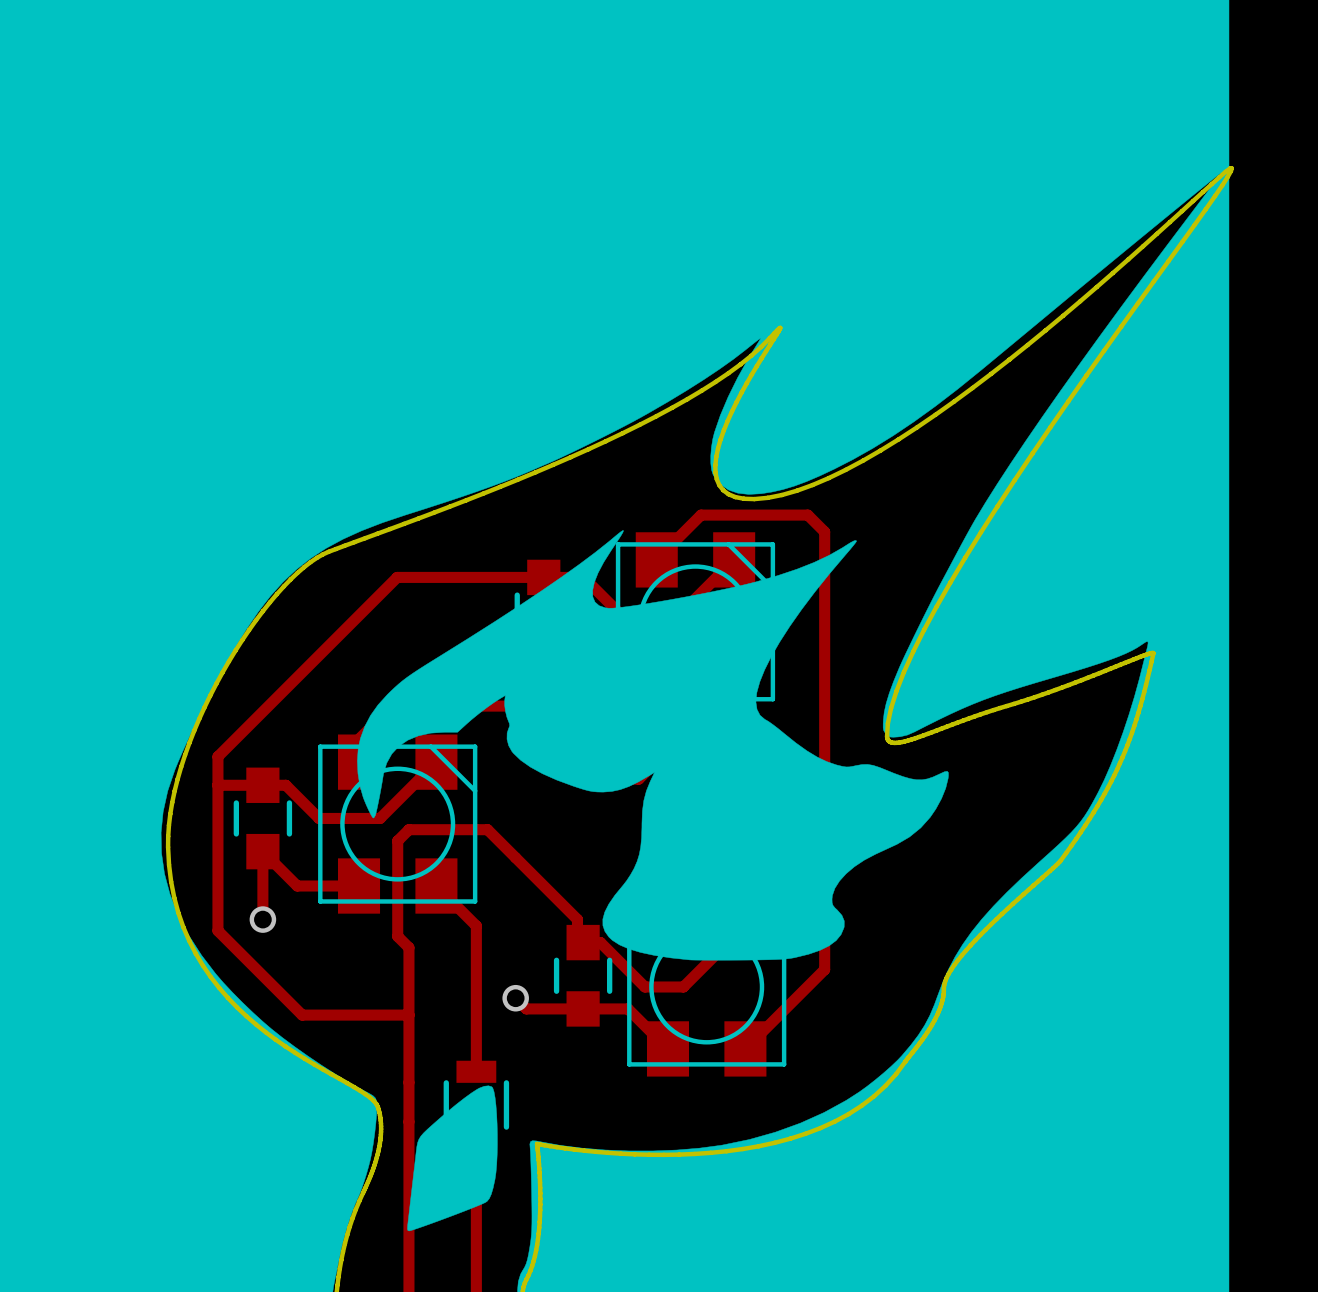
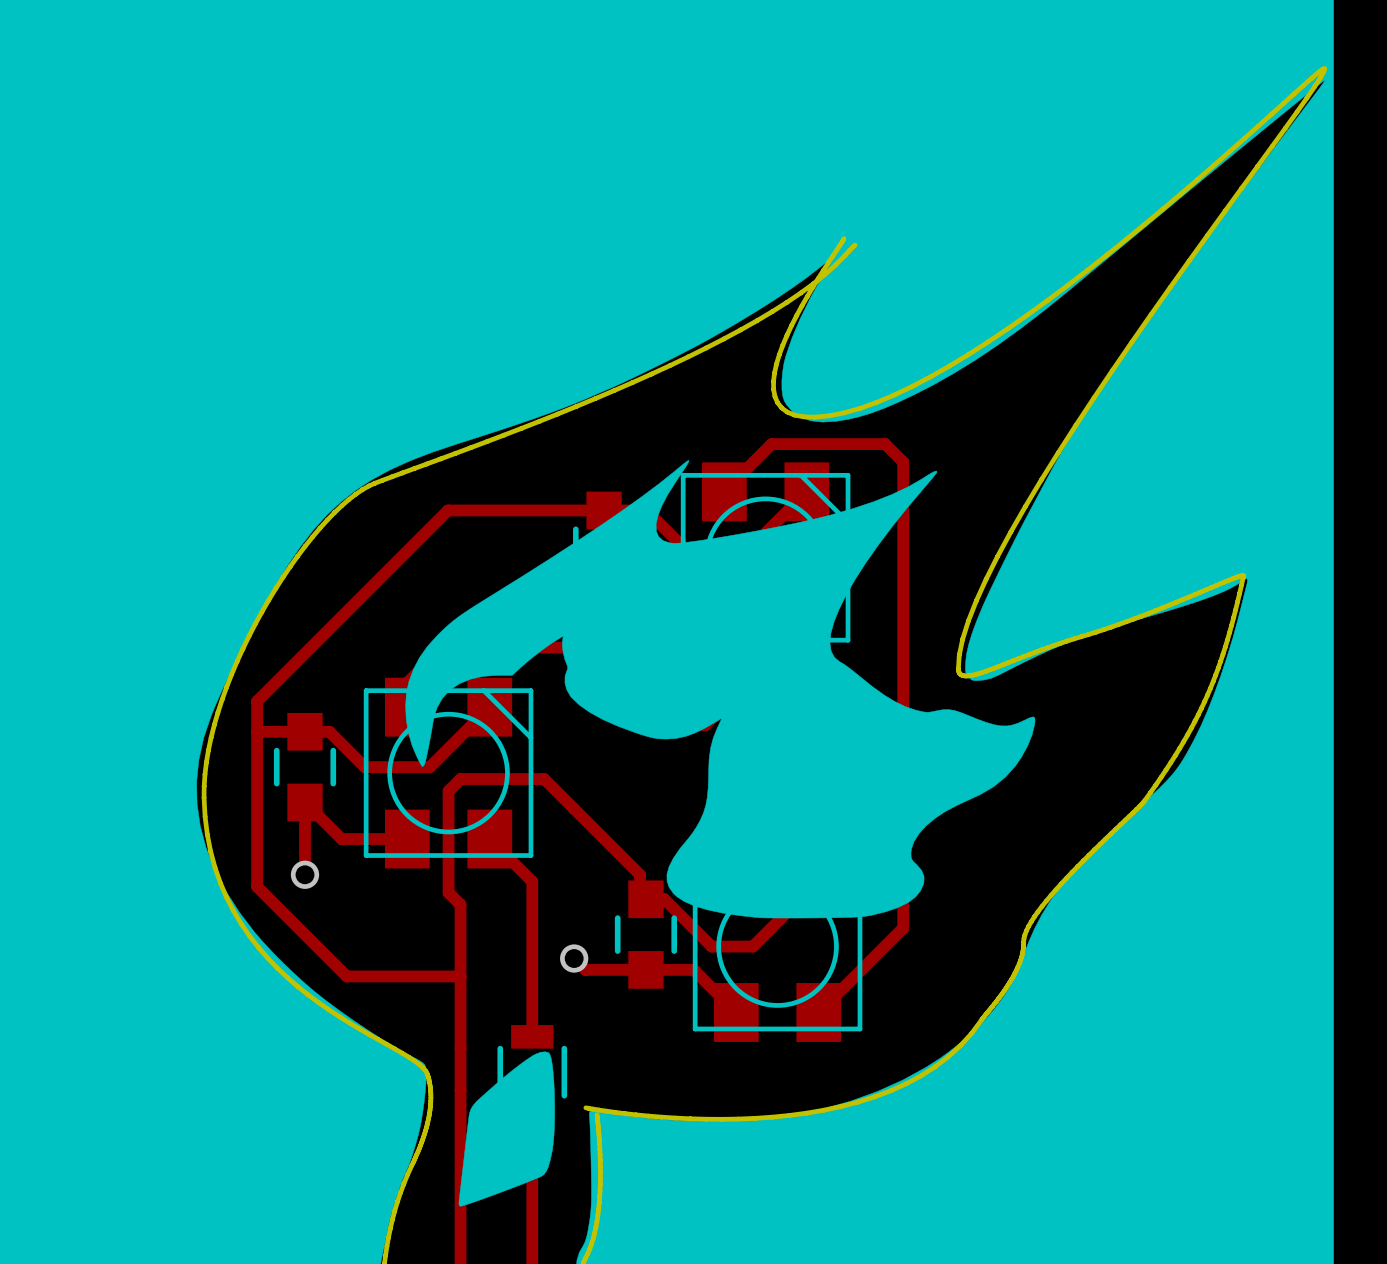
board edge: none -> (843, 238) (796, 315) (776, 364) (773, 381) (774, 396) (781, 407) (794, 415) (814, 417) (829, 415) (876, 402) (930, 376) (988, 341) (1047, 300) (1125, 239) (1324, 68) (1306, 98) (1132, 341) (1041, 479) (997, 556) (976, 600) (962, 639) (959, 655) (959, 672) (965, 676) (982, 672) (1047, 647) (1133, 619) (1242, 575)
board edge: (780, 327) (736, 401) (718, 448) (715, 465) (716, 479) (723, 490) (735, 497) (754, 499) (767, 497) (812, 485) (863, 460) (917, 427) (972, 387) (1045, 330) (1231, 168) (1214, 196) (1050, 427) (965, 557) (924, 629) (903, 672) (891, 708) (887, 738) (889, 741) (894, 742) (911, 739) (1055, 689) (1152, 652) -> none
board edge: (1153, 653) (1140, 706) (1127, 745) (1111, 781) (1089, 818) (1059, 861) (991, 924) (957, 960) (946, 977) (940, 1005) (929, 1029) (896, 1074) (874, 1096) (848, 1114) (820, 1128) (790, 1138) (742, 1149) (694, 1153) (649, 1154) (595, 1151) (537, 1144) -> (1243, 576) (1229, 632) (1215, 674) (1198, 714) (1179, 748) (1143, 802) (1072, 872) (1038, 911) (1026, 930) (1020, 960) (1009, 982) (971, 1033) (948, 1056) (920, 1075) (890, 1090) (858, 1102) (806, 1113) (755, 1118) (705, 1119) (648, 1116) (585, 1107)

